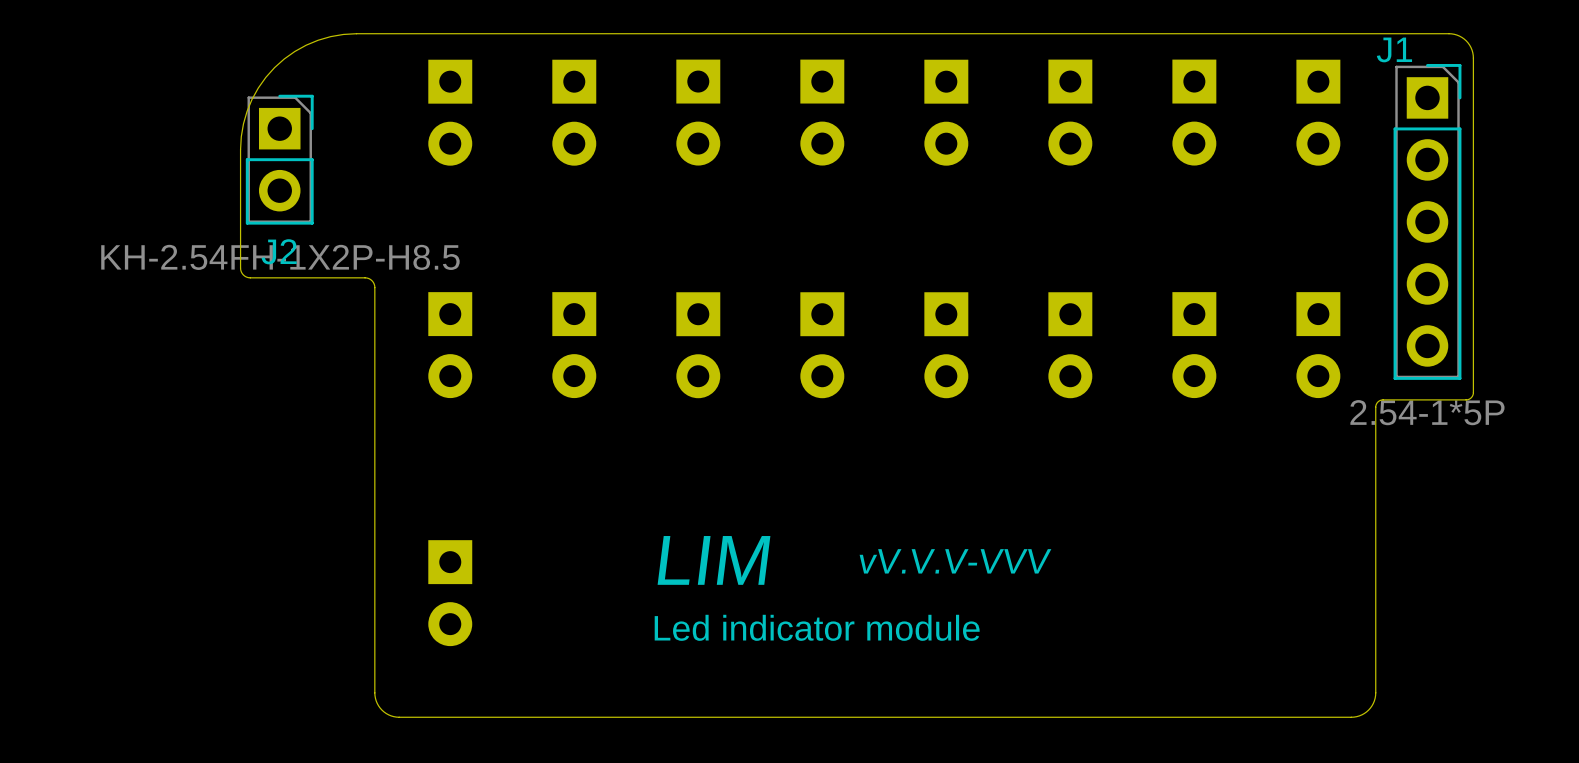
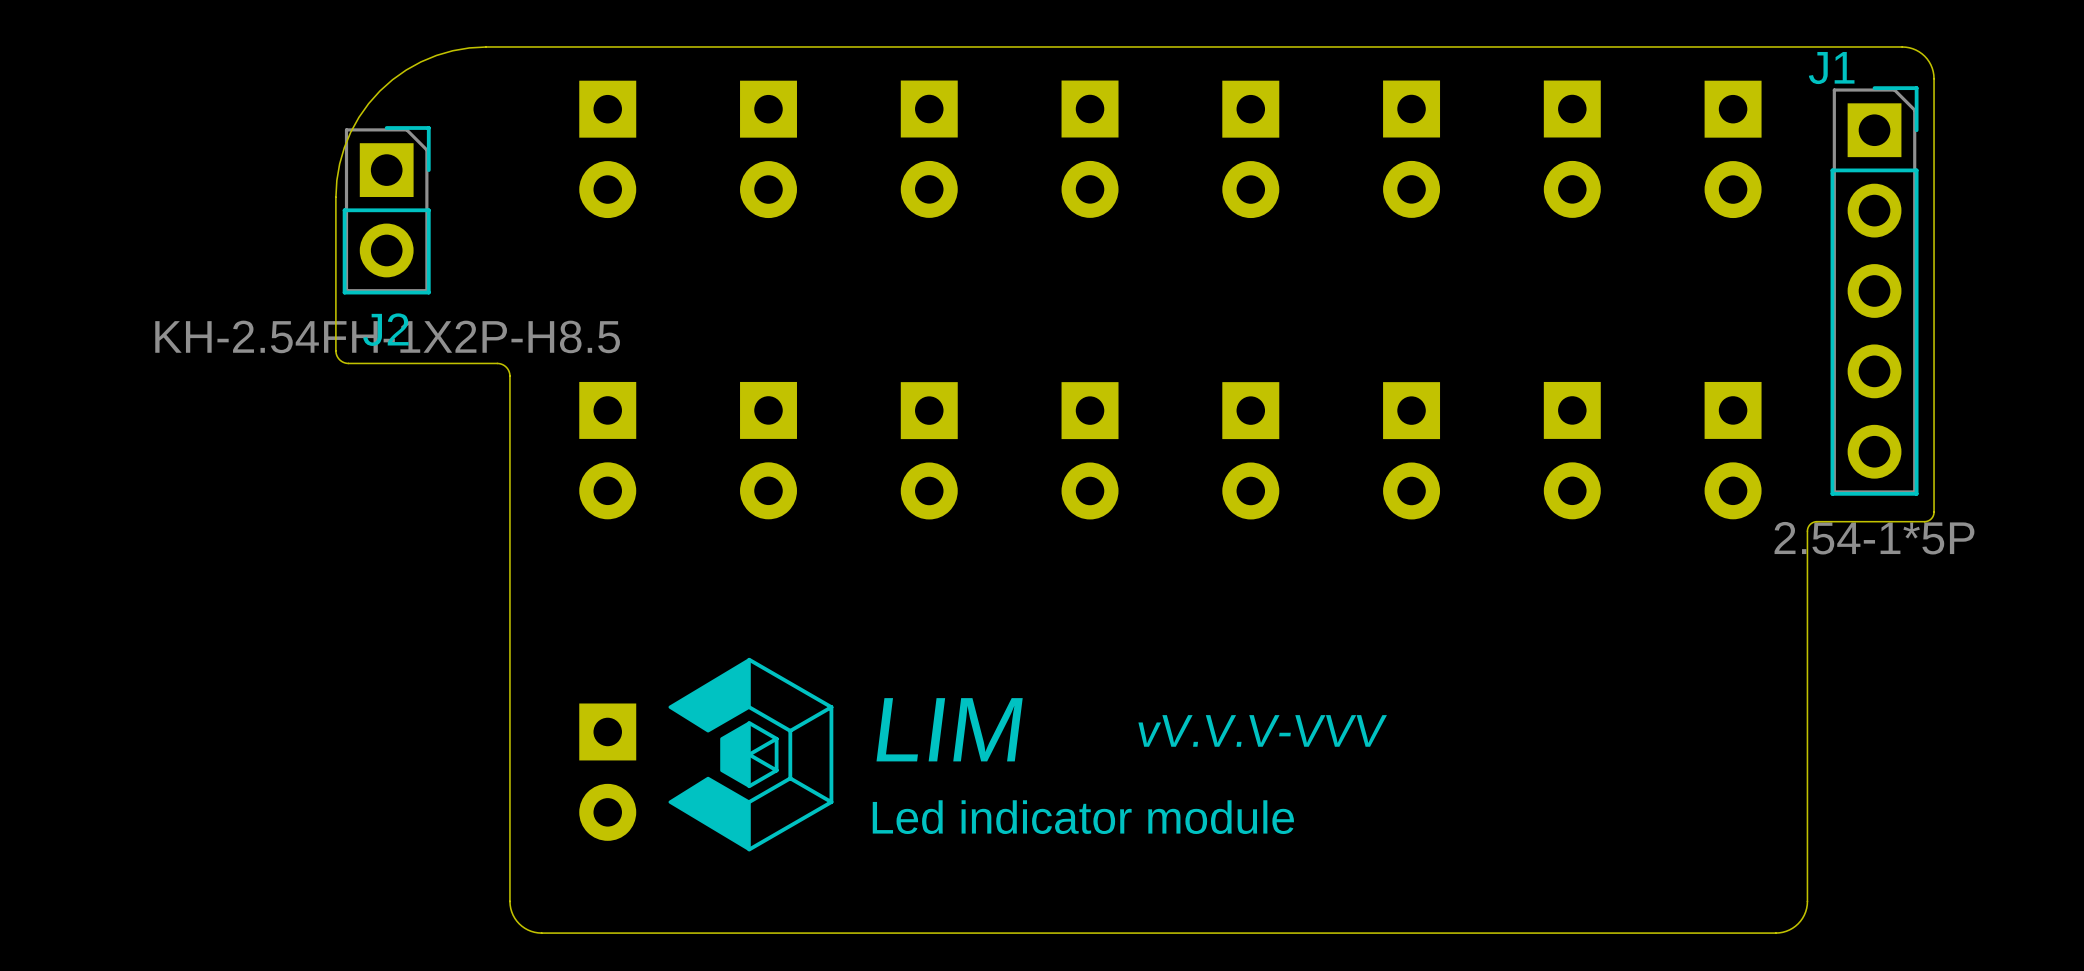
drawing: none -> [668, 658, 751, 852]
line: none -> (749, 659) (831, 707)
line: none -> (749, 707) (790, 730)
line: none -> (831, 707) (831, 802)
line: none -> (831, 707) (790, 730)
line: none -> (749, 722) (776, 738)
line: none -> (790, 730) (790, 778)
line: none -> (776, 738) (776, 770)
line: none -> (776, 738) (749, 754) (776, 770)
line: none -> (776, 770) (749, 786)
line: none -> (790, 778) (831, 802)
line: none -> (790, 778) (749, 802)
line: none -> (831, 802) (749, 849)

